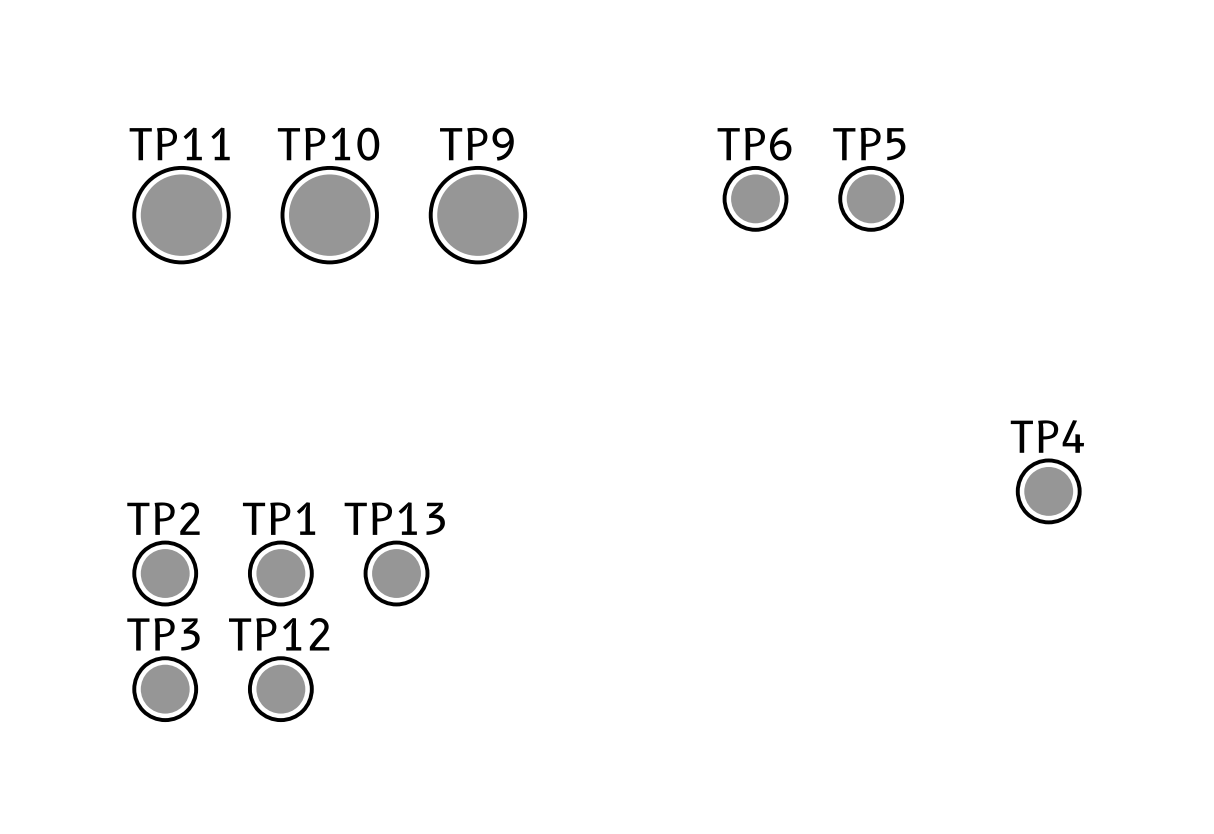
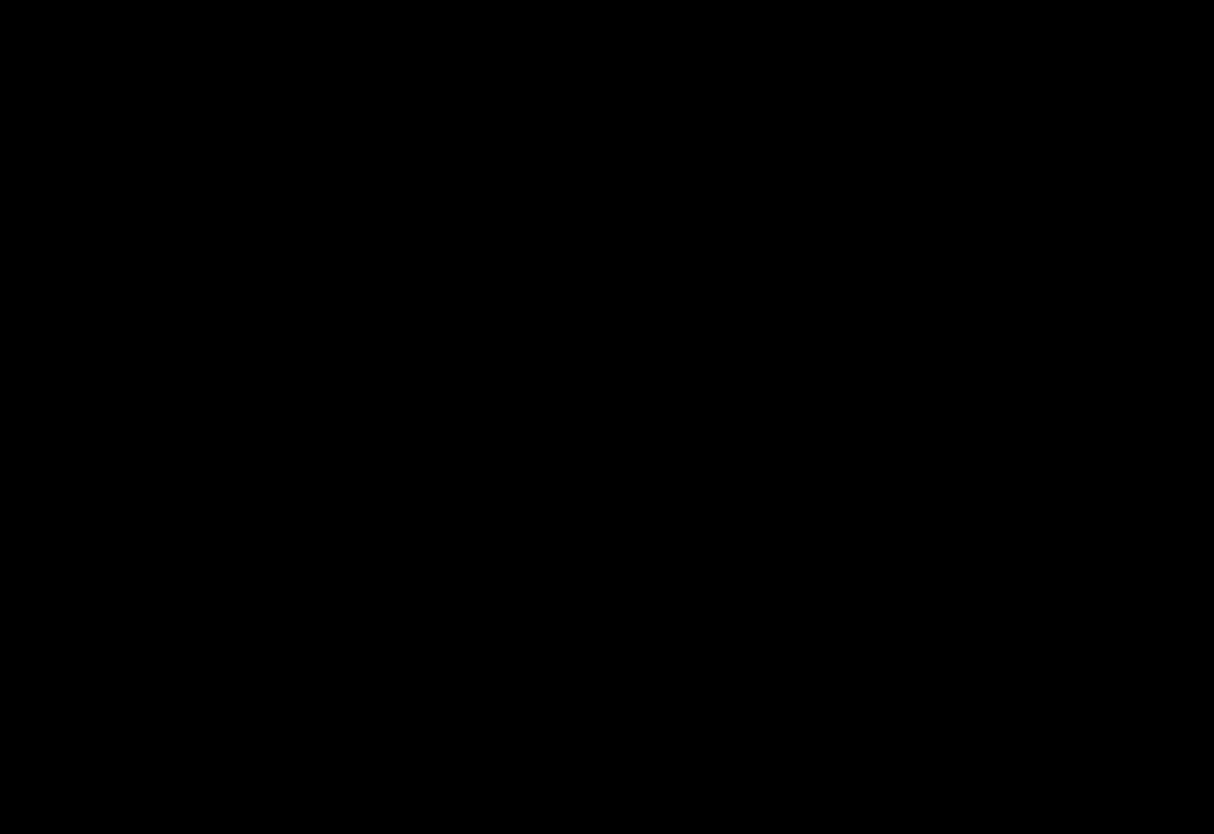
TP6: (755, 198) -> none
TP5: (871, 198) -> none
TP11: (181, 215) -> none
TP10: (329, 215) -> none
TP9: (477, 215) -> none
TP4: (1048, 491) -> none
TP2: (165, 573) -> none
TP1: (280, 573) -> none
TP13: (396, 573) -> none
TP3: (165, 689) -> none
TP12: (280, 689) -> none

